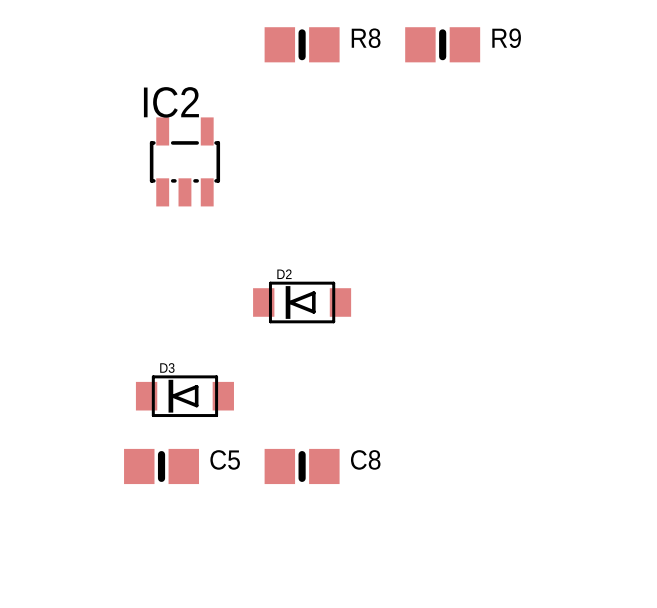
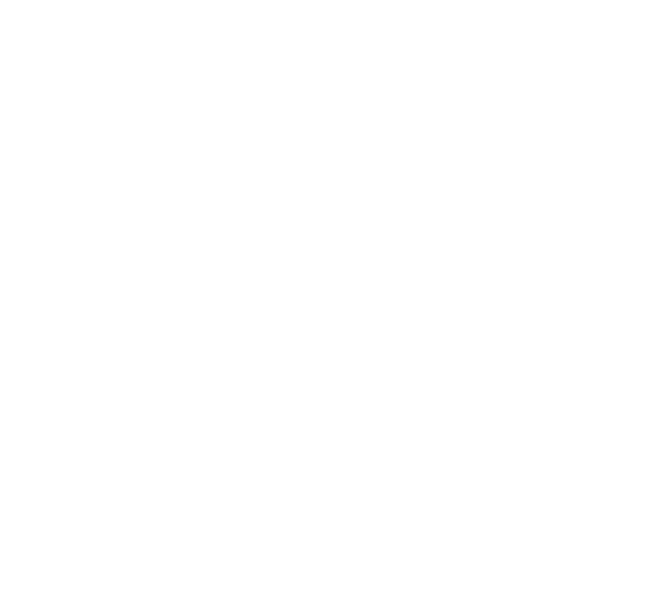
R8: (302, 44) -> none
R9: (442, 44) -> none
IC2: (184, 161) -> none
D2: (302, 302) -> none
D3: (184, 396) -> none
C5: (161, 466) -> none
C8: (302, 466) -> none

